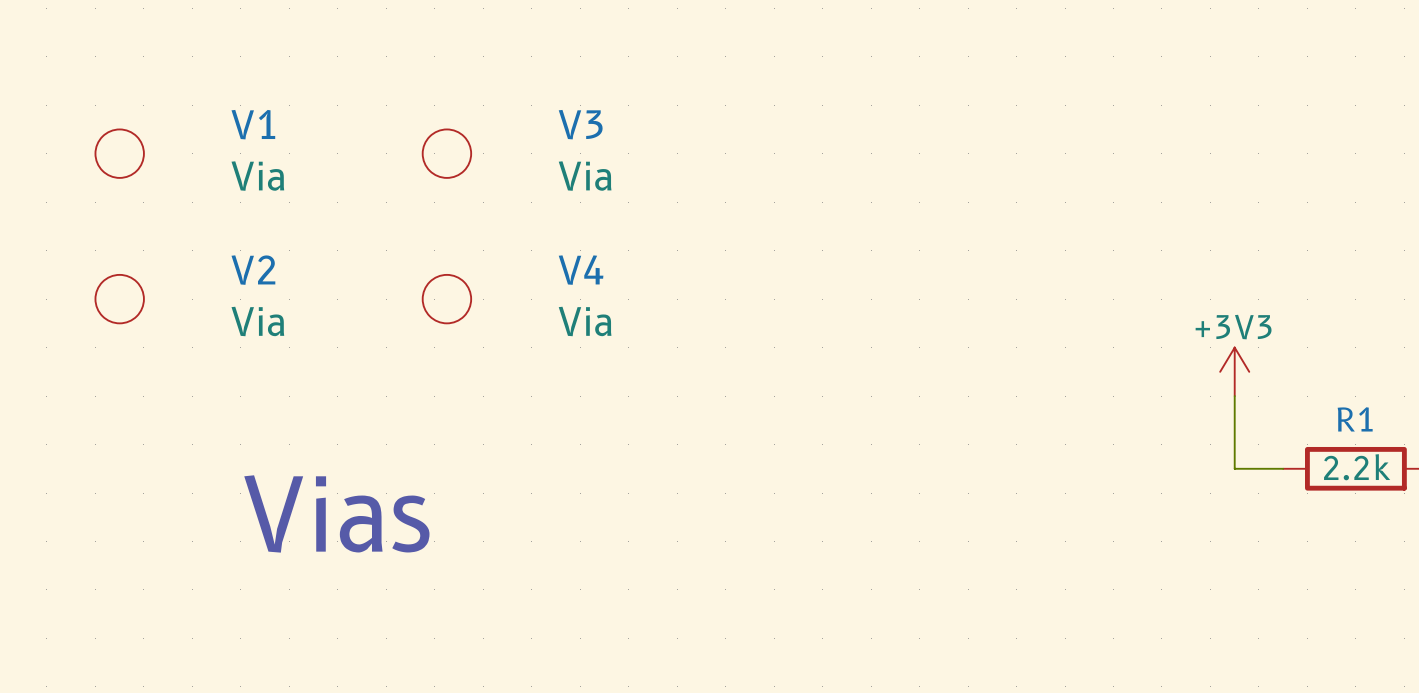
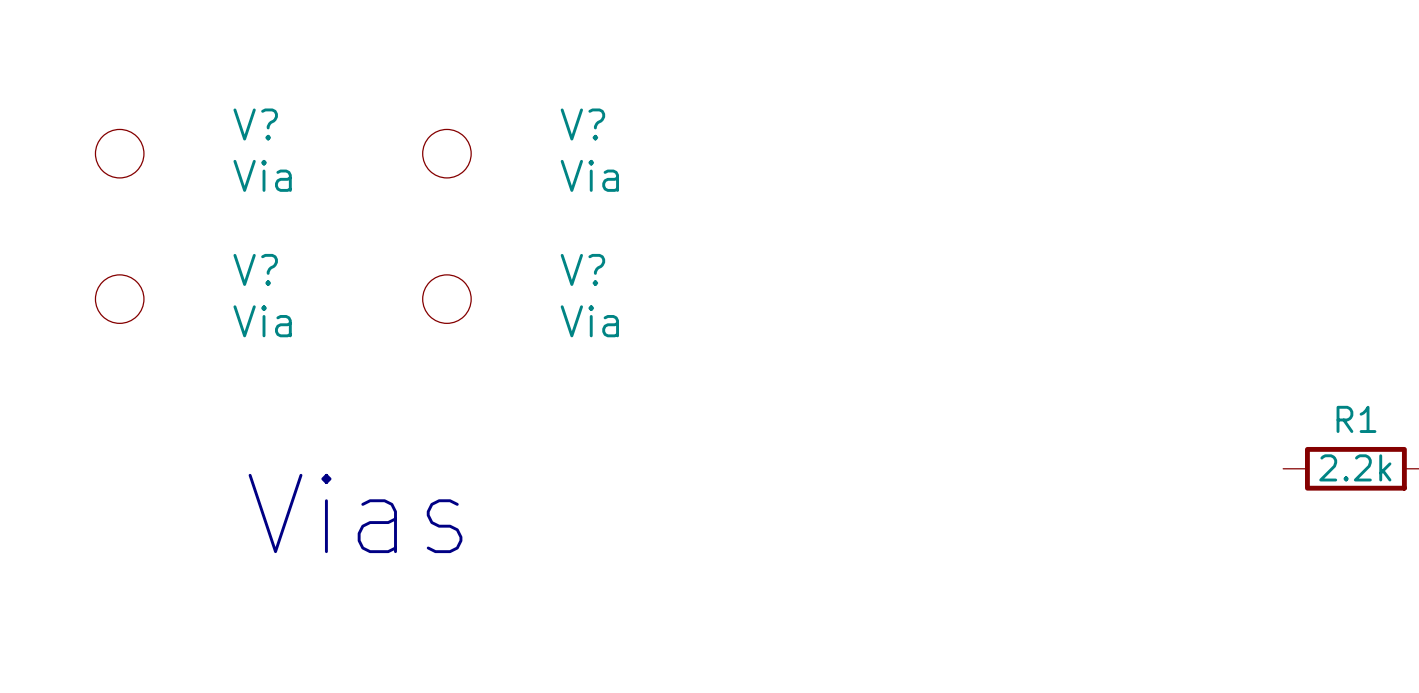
V1 name: V1 (253, 124) -> V? (255, 124)
V3 name: V3 (580, 124) -> V? (582, 124)
V2 name: V2 (253, 270) -> V? (255, 269)
V4 name: V4 (581, 270) -> V? (582, 269)
power symbol: +3V3 (1234, 371) -> none
wire: (1234, 396) (1234, 468) (1283, 468) -> none

